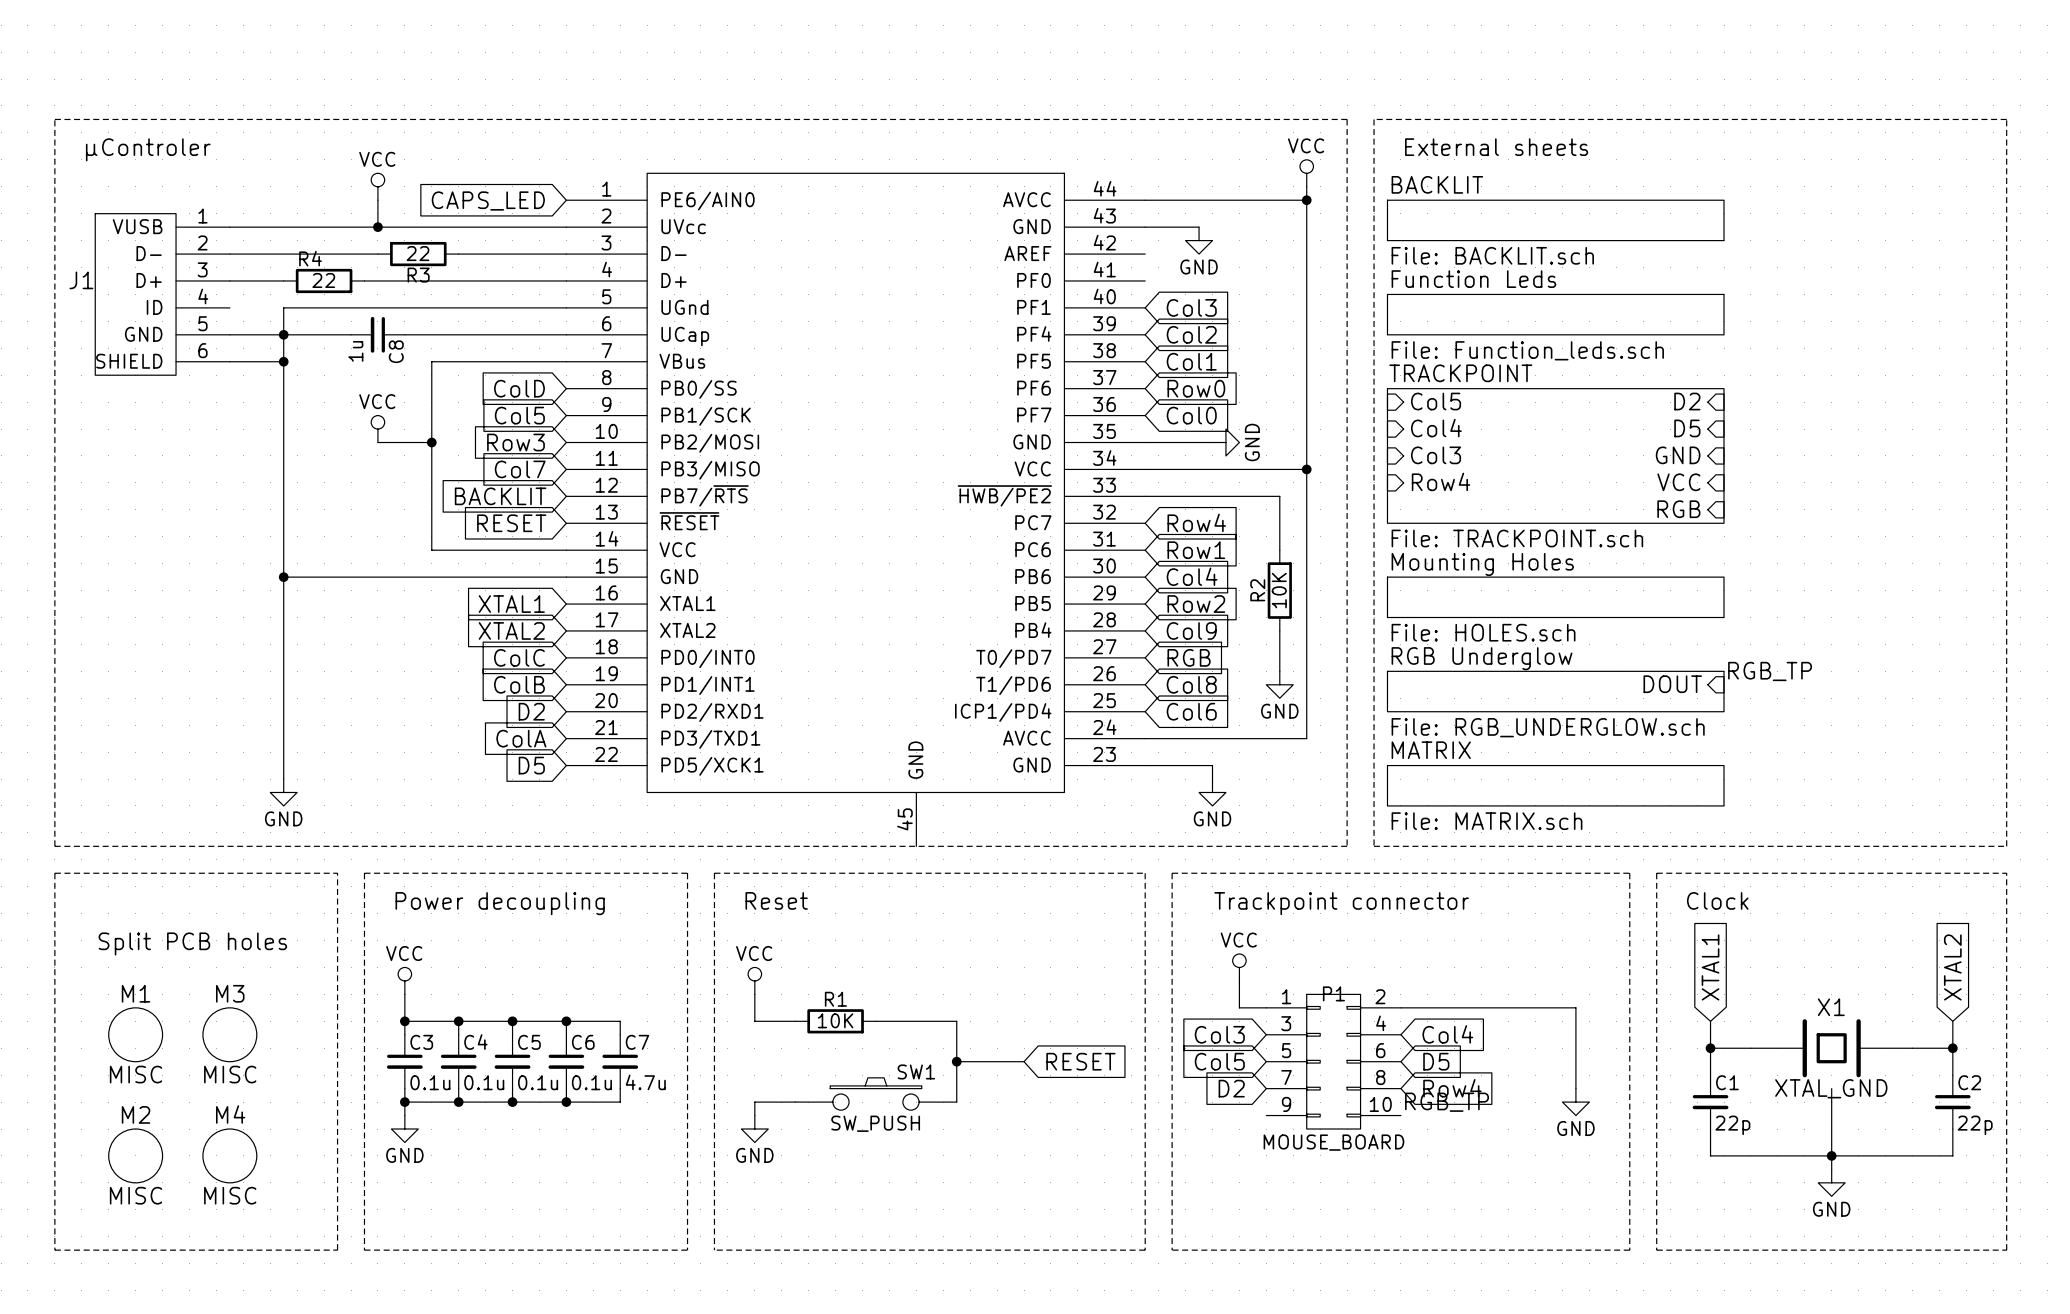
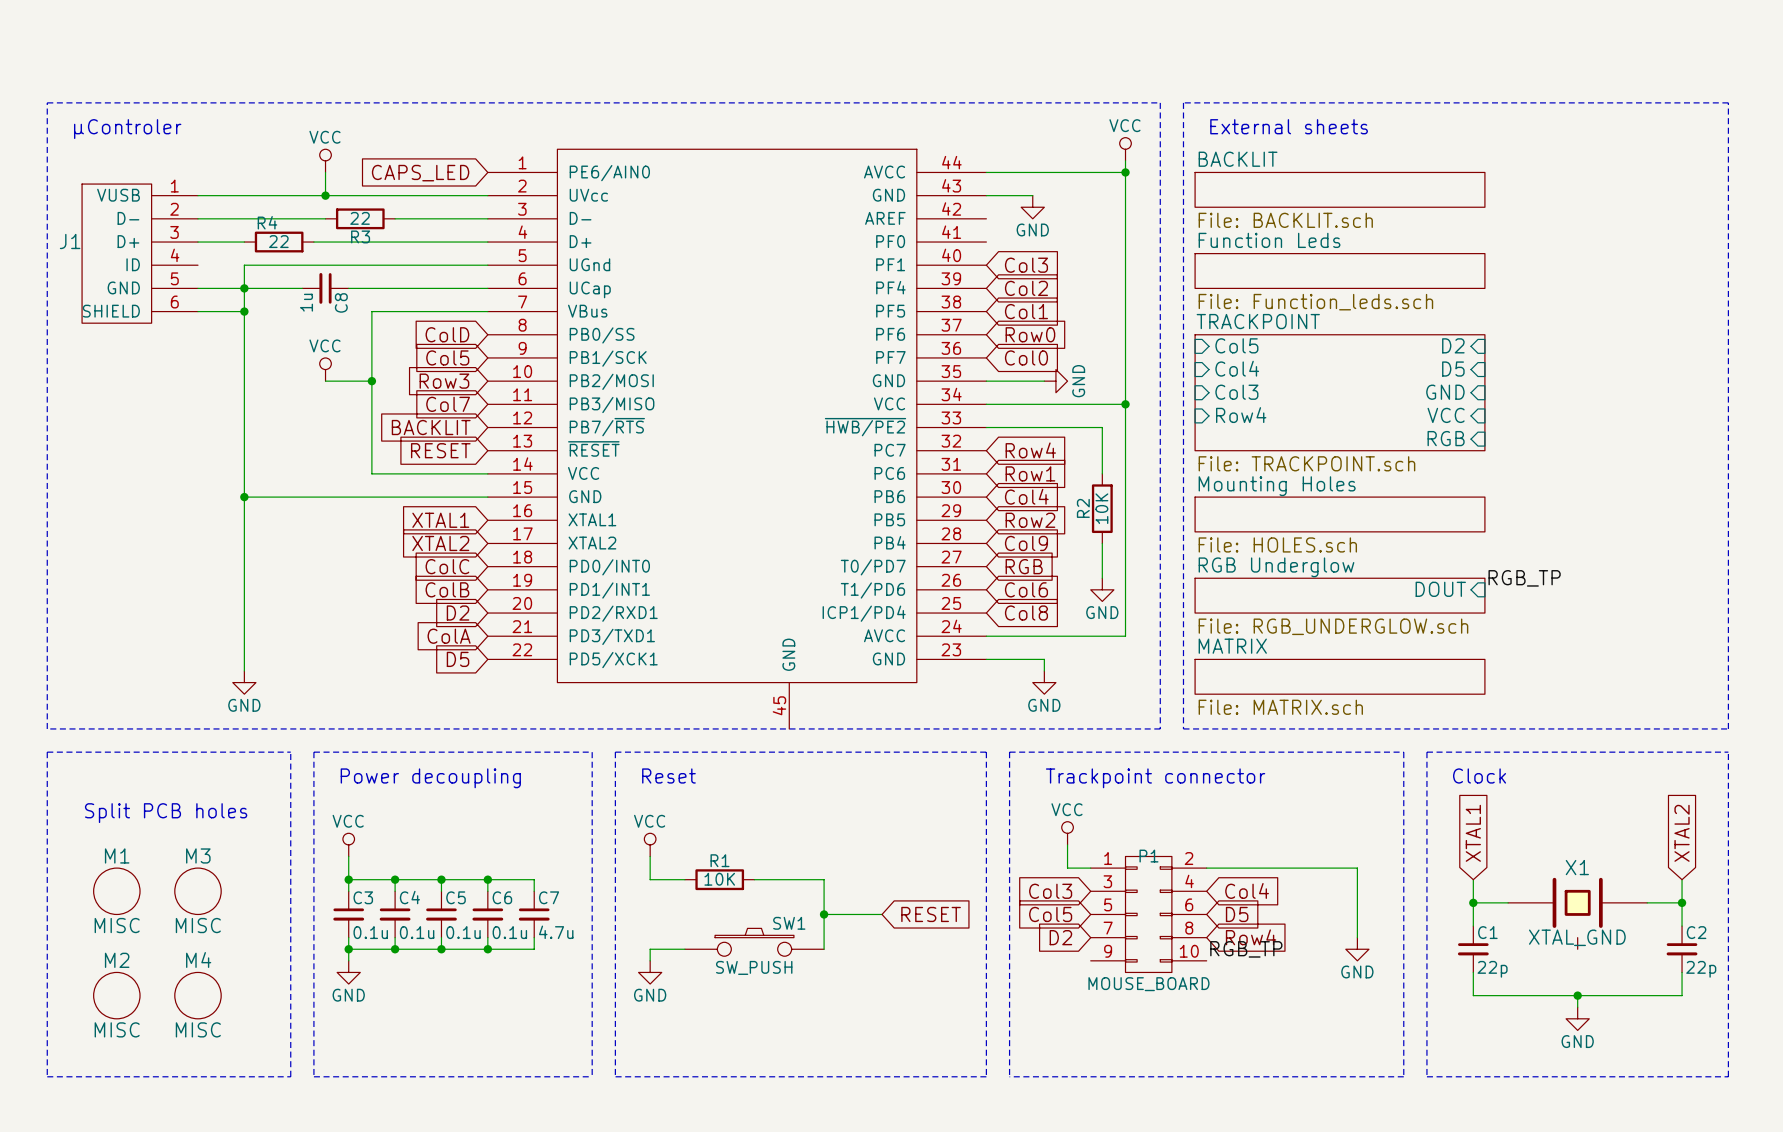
global label: Col8 (1191, 684) -> Col6 (1026, 589)
global label: Col6 (1191, 711) -> Col8 (1026, 613)
wire: (1831, 1102) (1831, 1155) -> none

